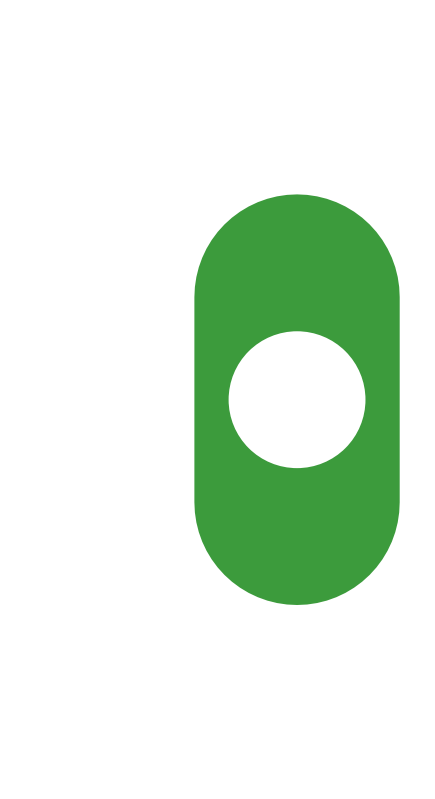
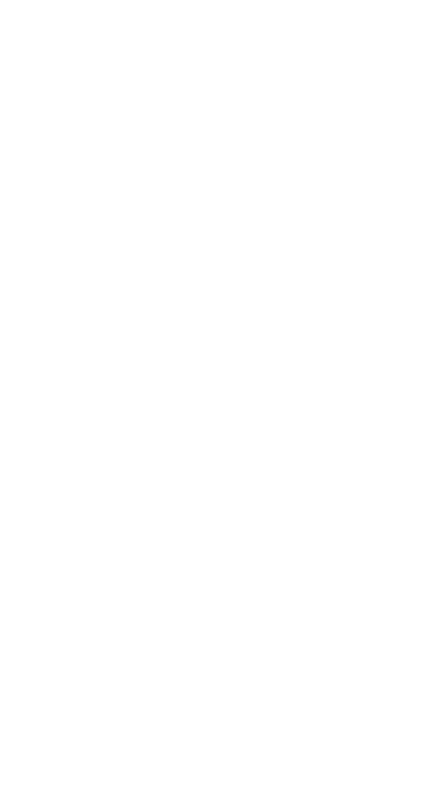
part: (297, 399) -> none

